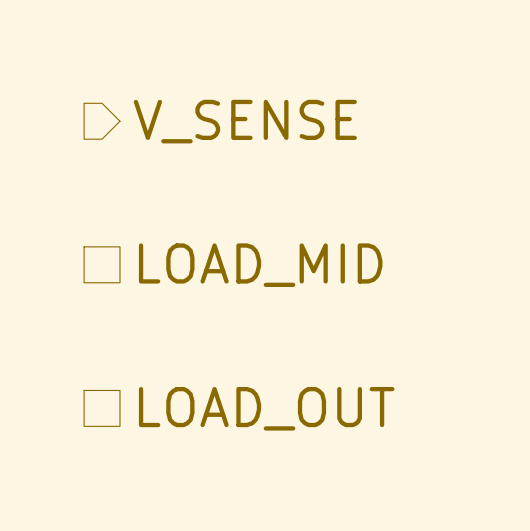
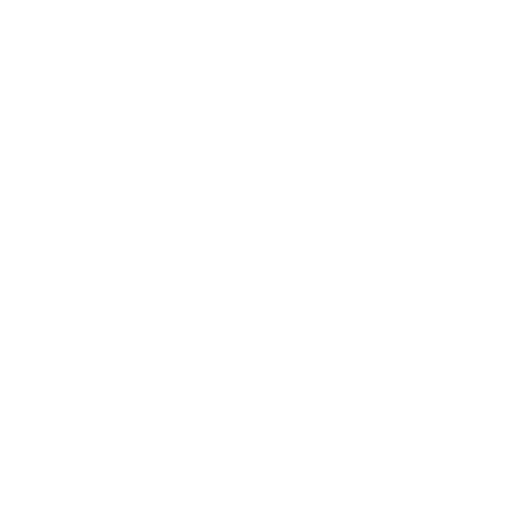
hierarchical label: V_SENSE (245, 121) -> none
hierarchical label: LOAD_MID (260, 265) -> none
hierarchical label: LOAD_OUT (266, 408) -> none

